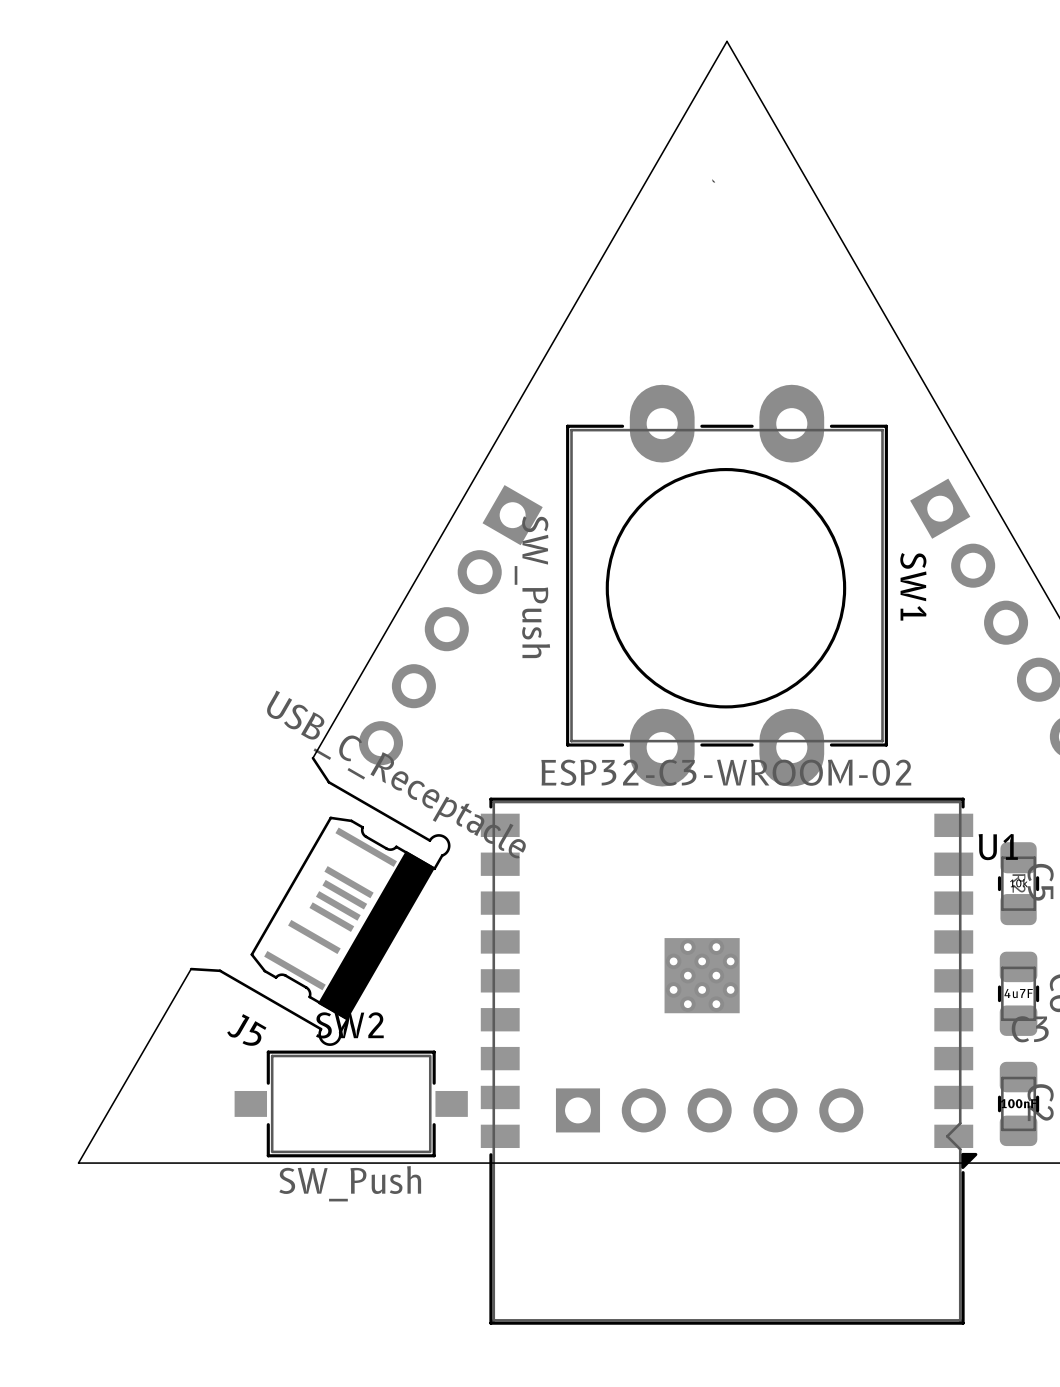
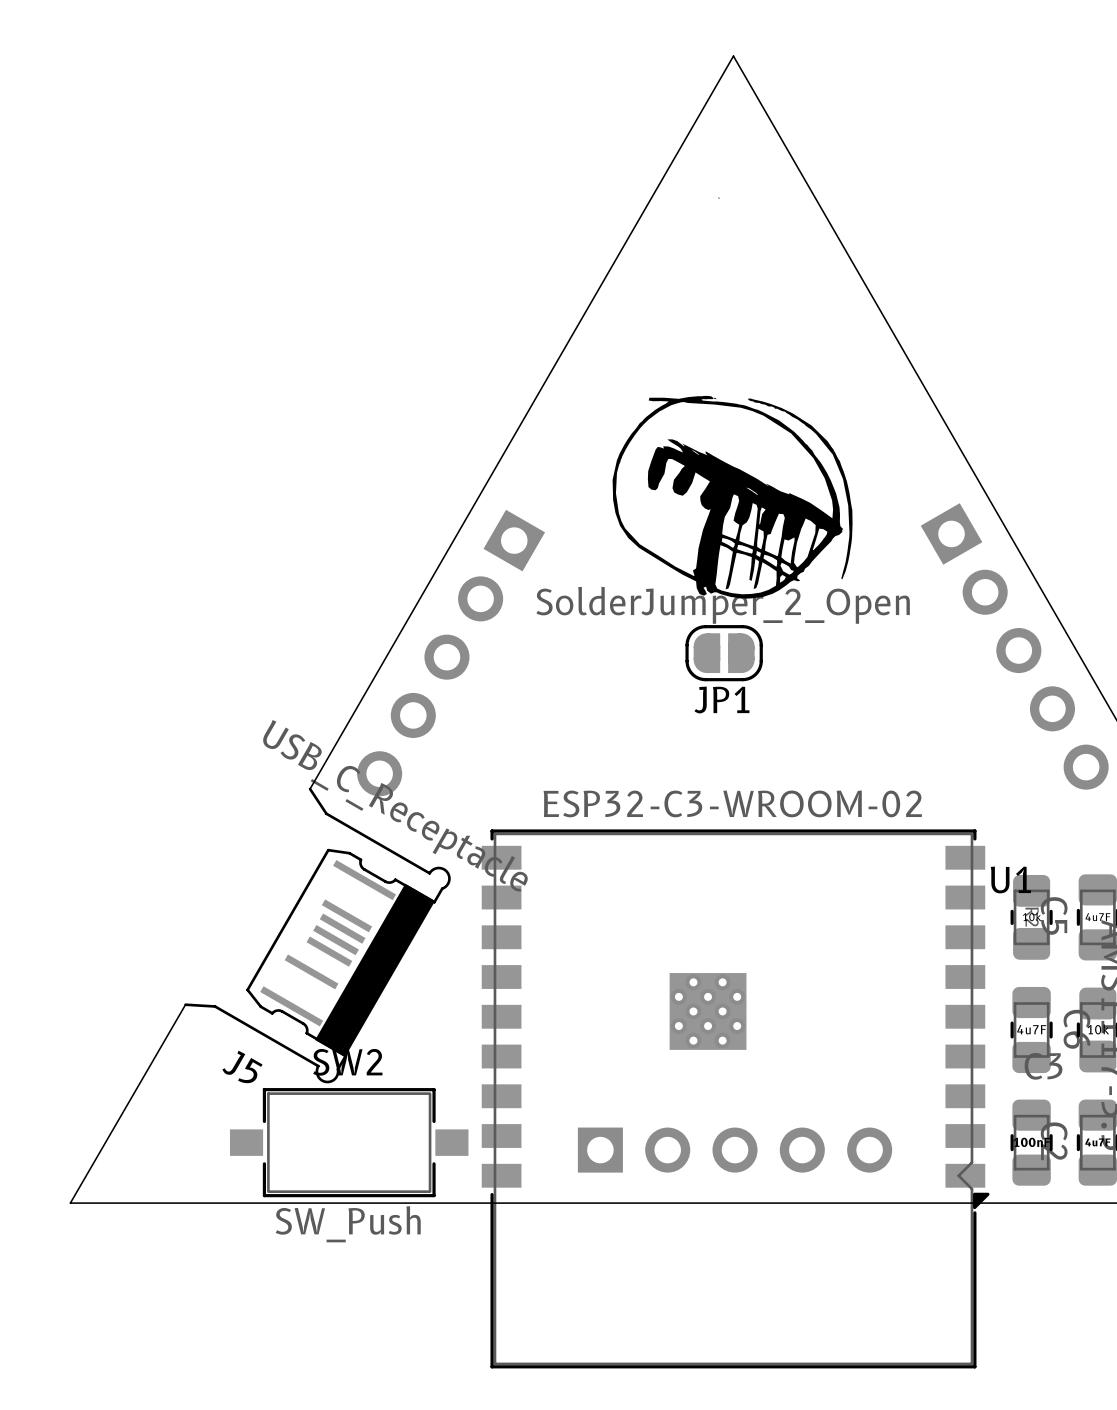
drawing position: (713, 181) -> (715, 398)
drawing: none -> [612, 395, 853, 599]
SW1: SW_Push (727, 585) -> none
JP1: none -> SolderJumper_2_Open (724, 653)
part position: (709, 1110) -> (735, 1150)

